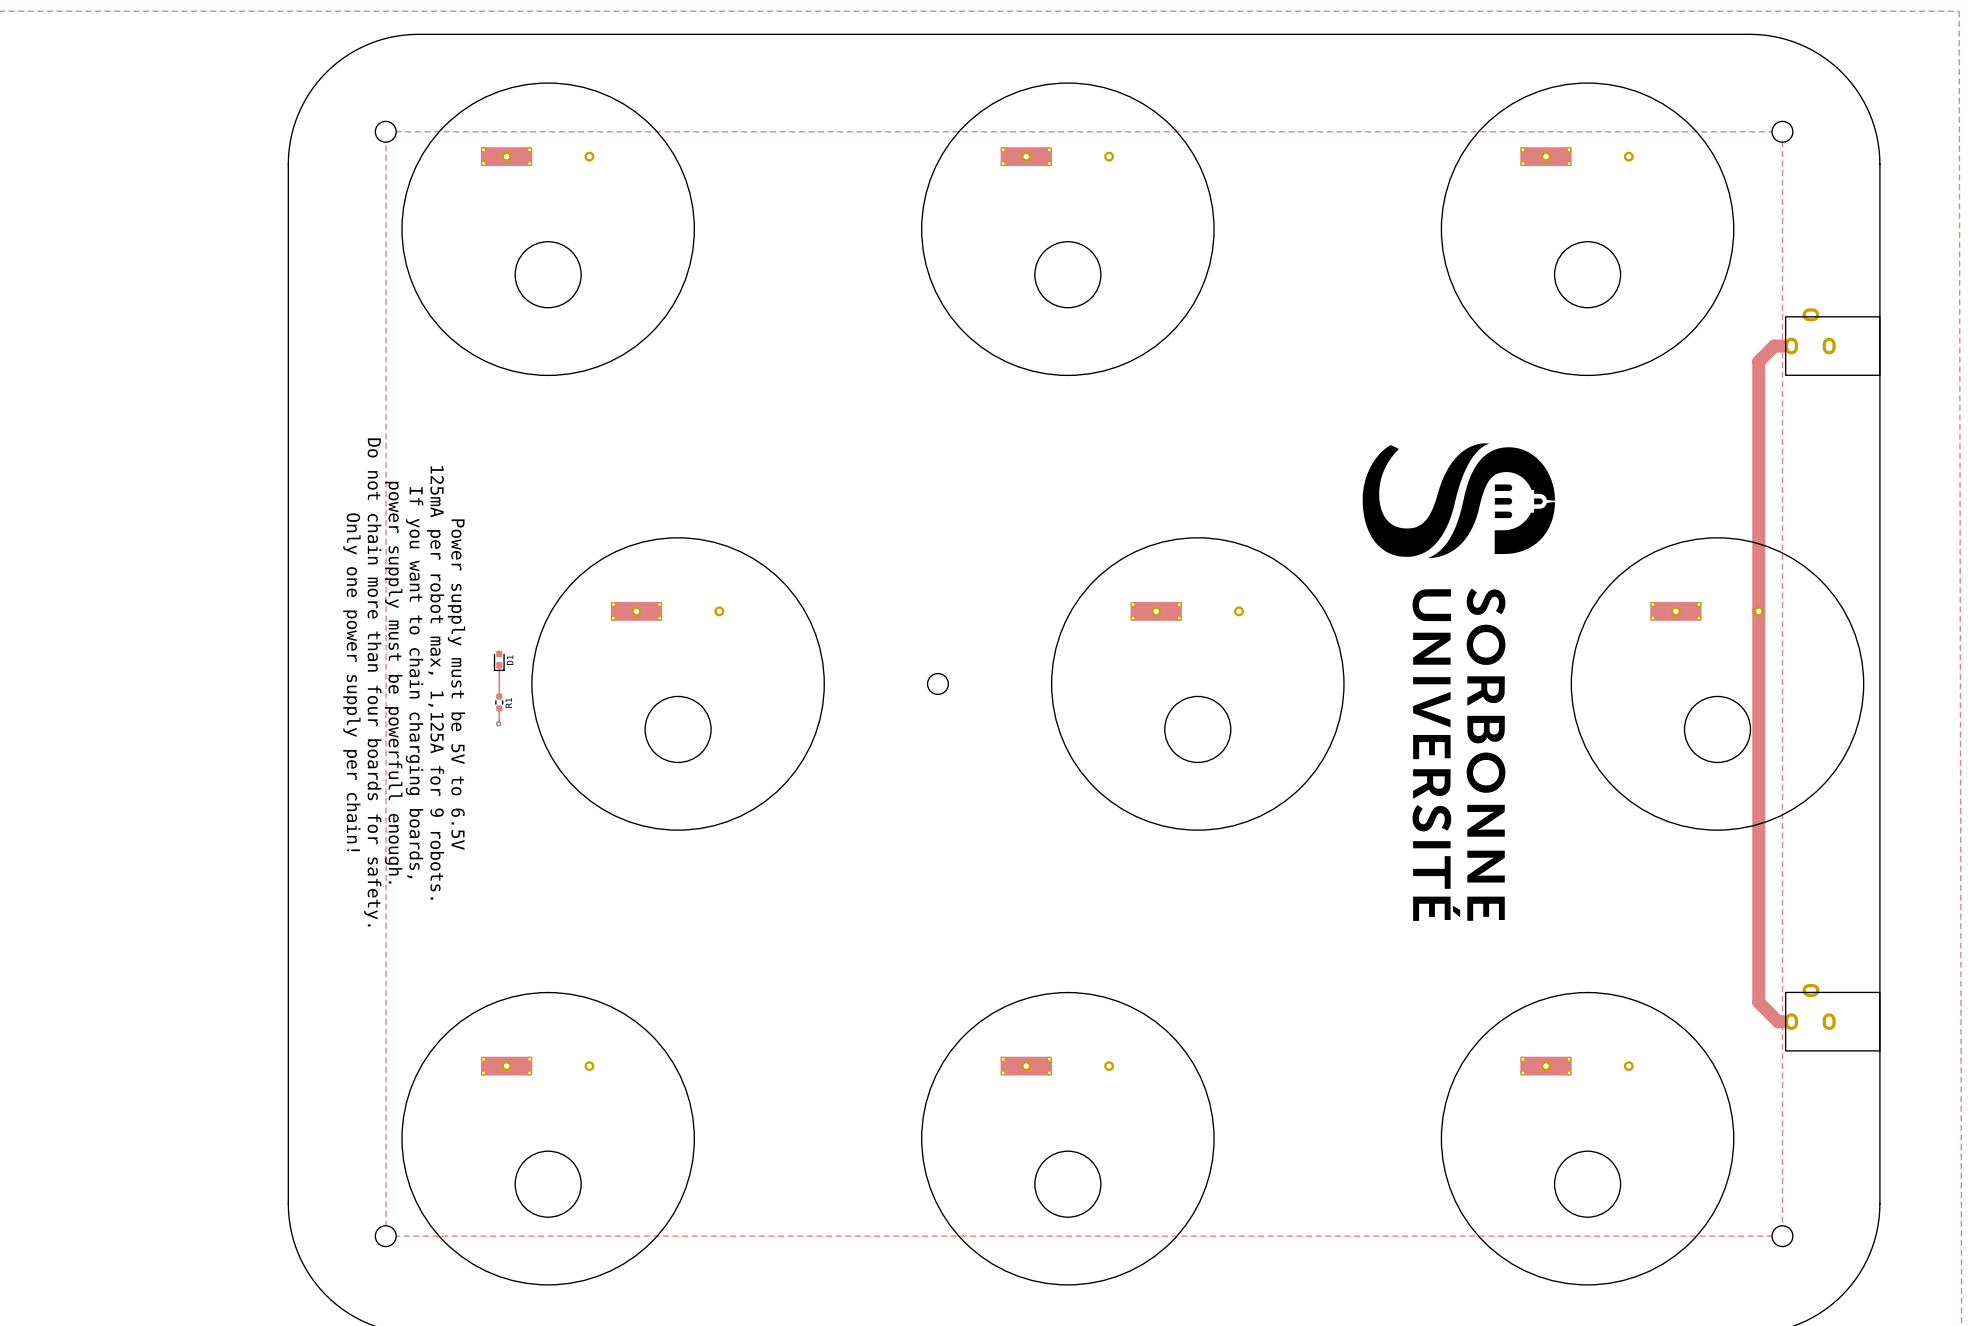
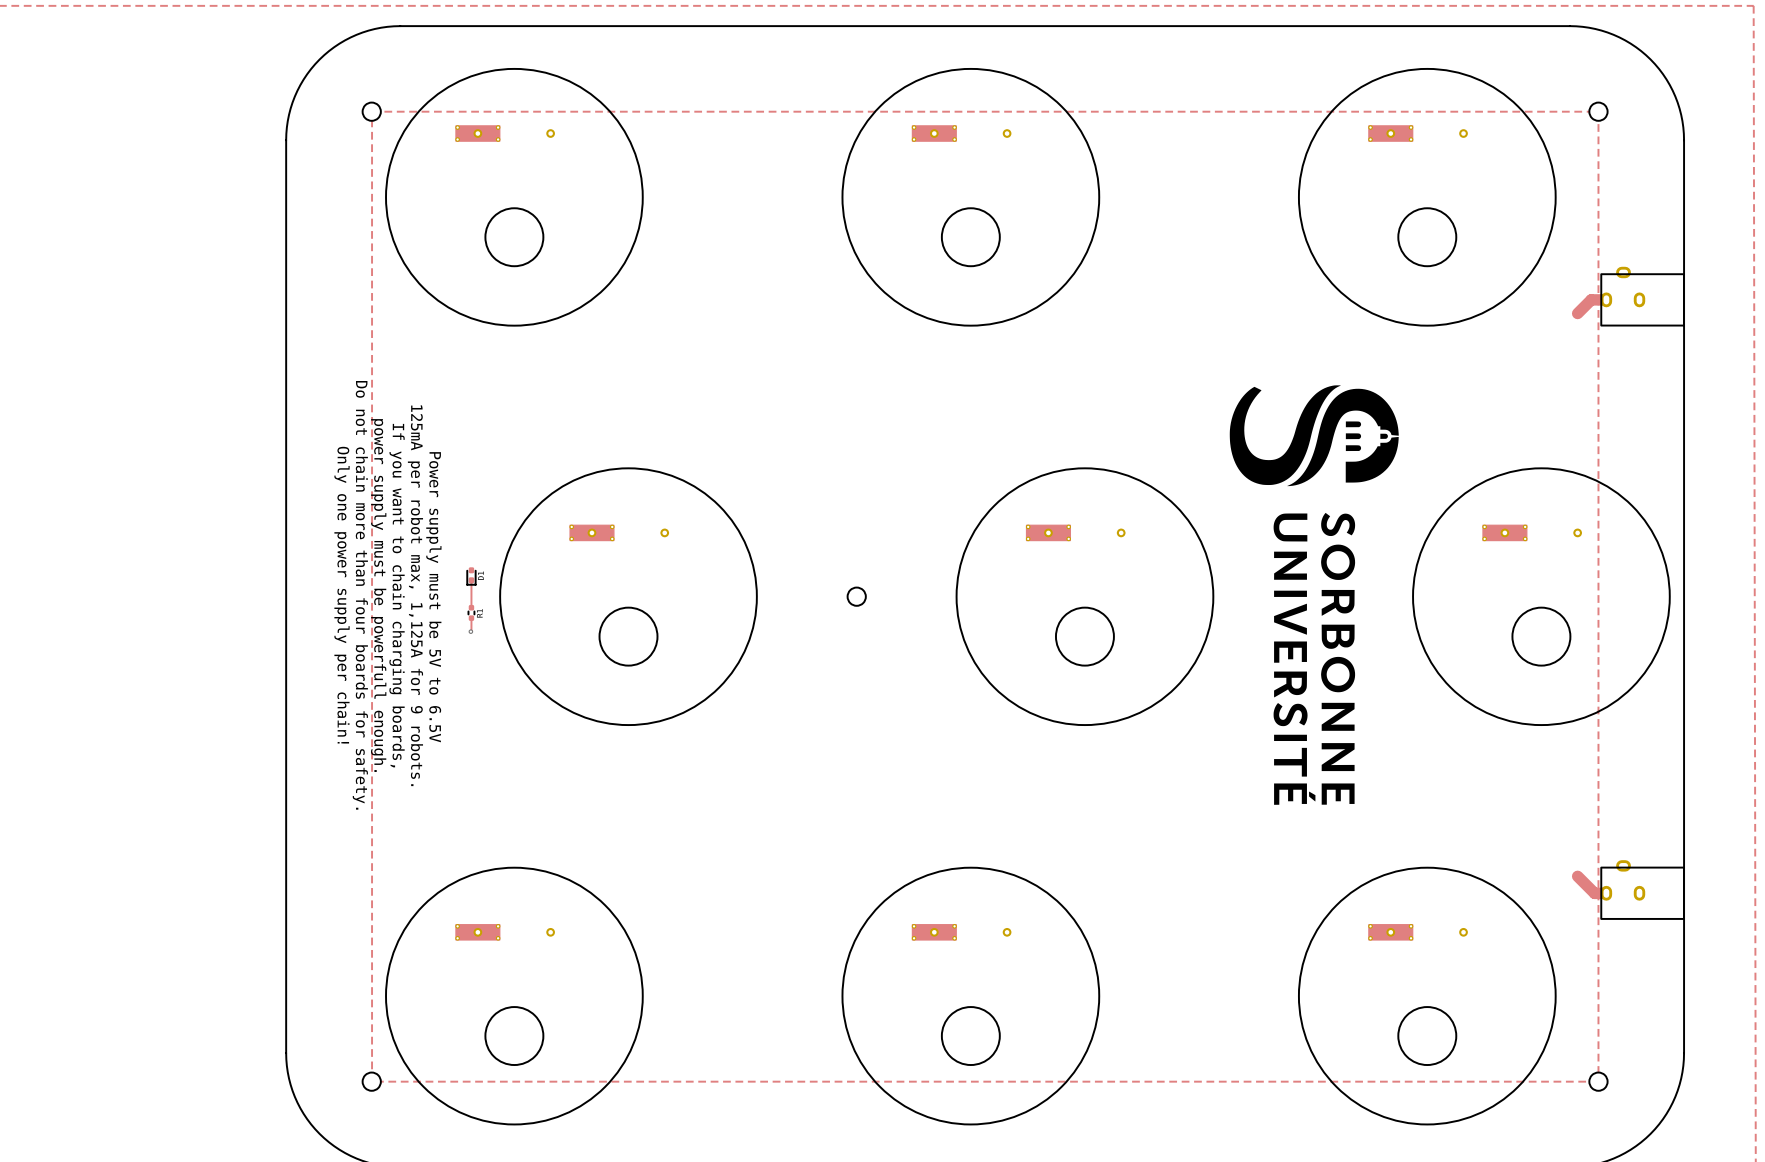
track: (1758, 361) (1758, 1002) -> none

